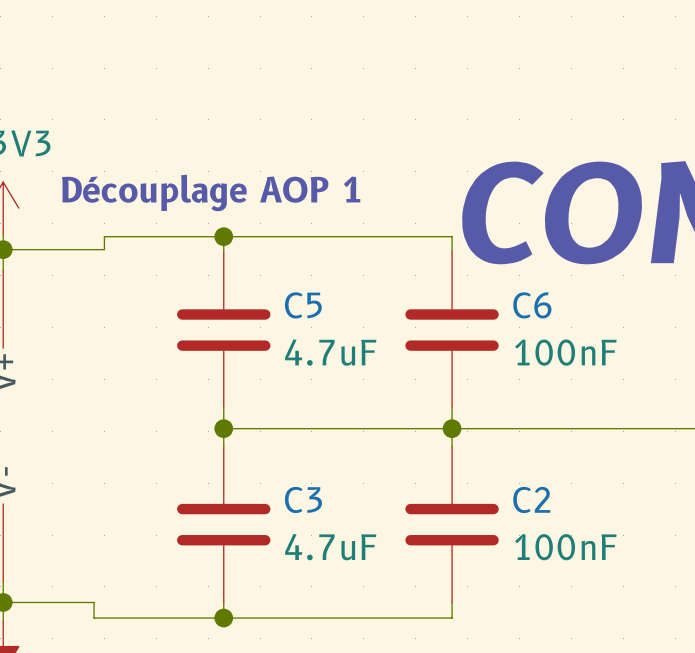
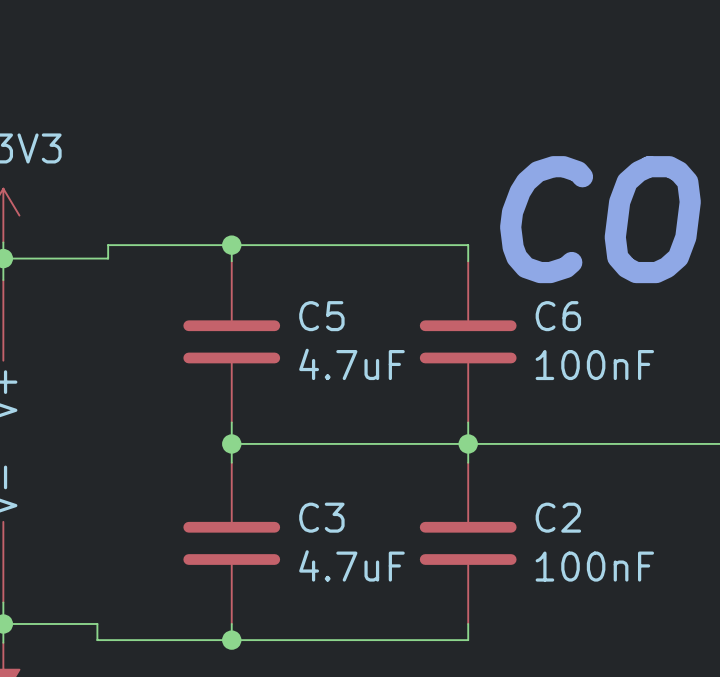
text: Découplage AOP 1 (211, 192) -> none

